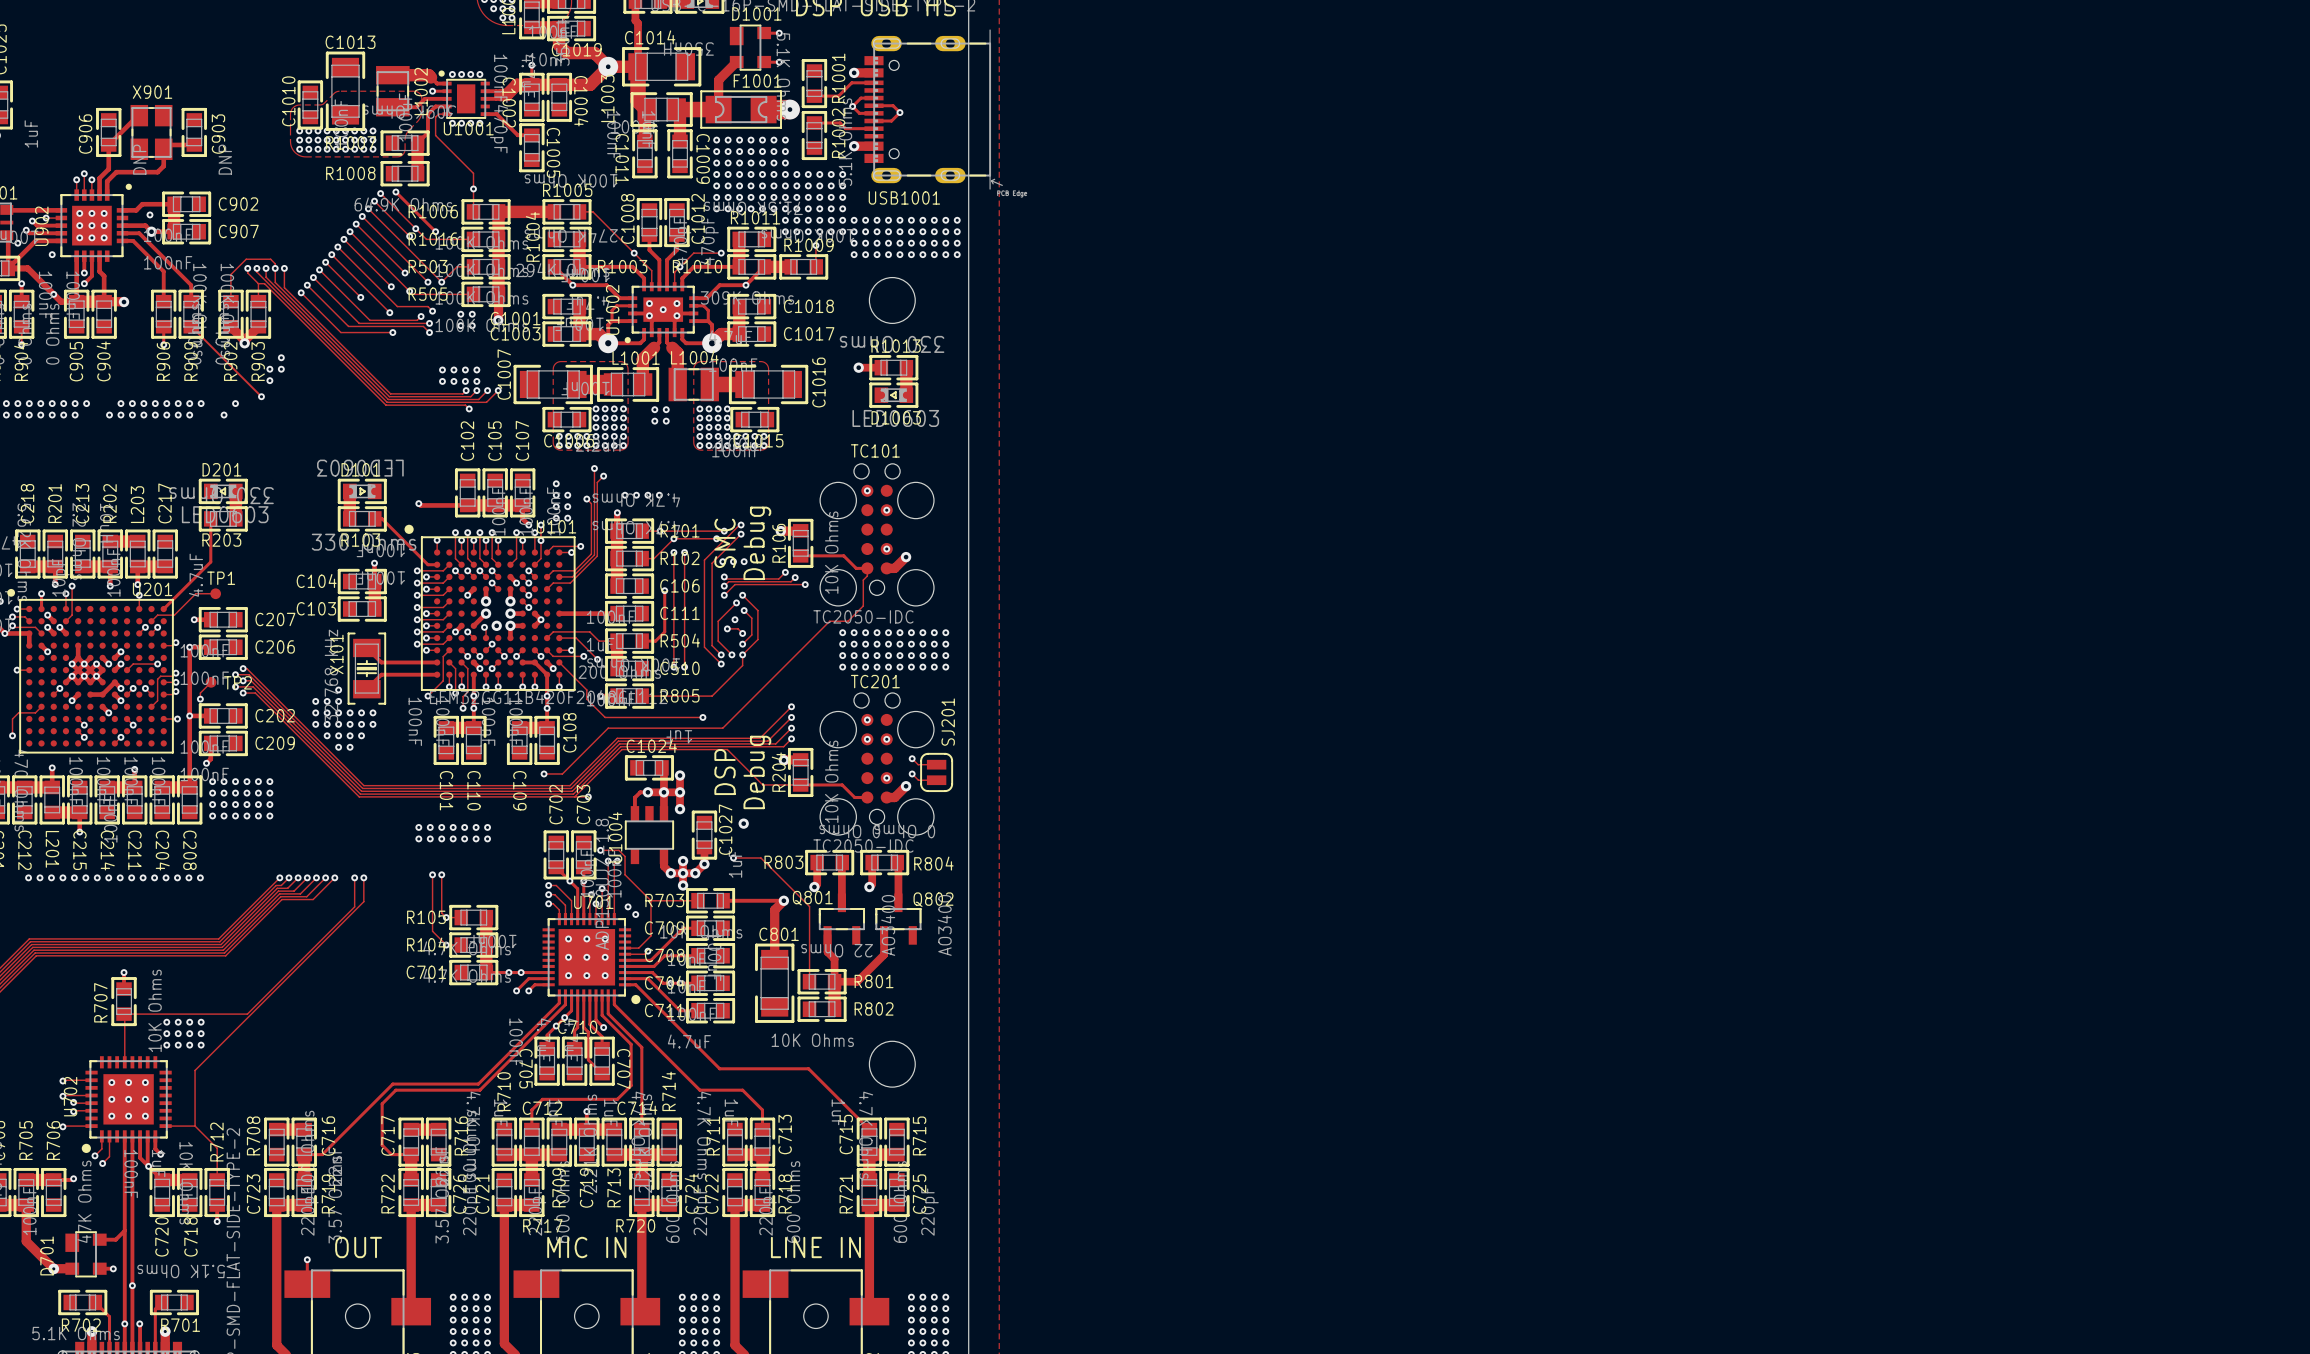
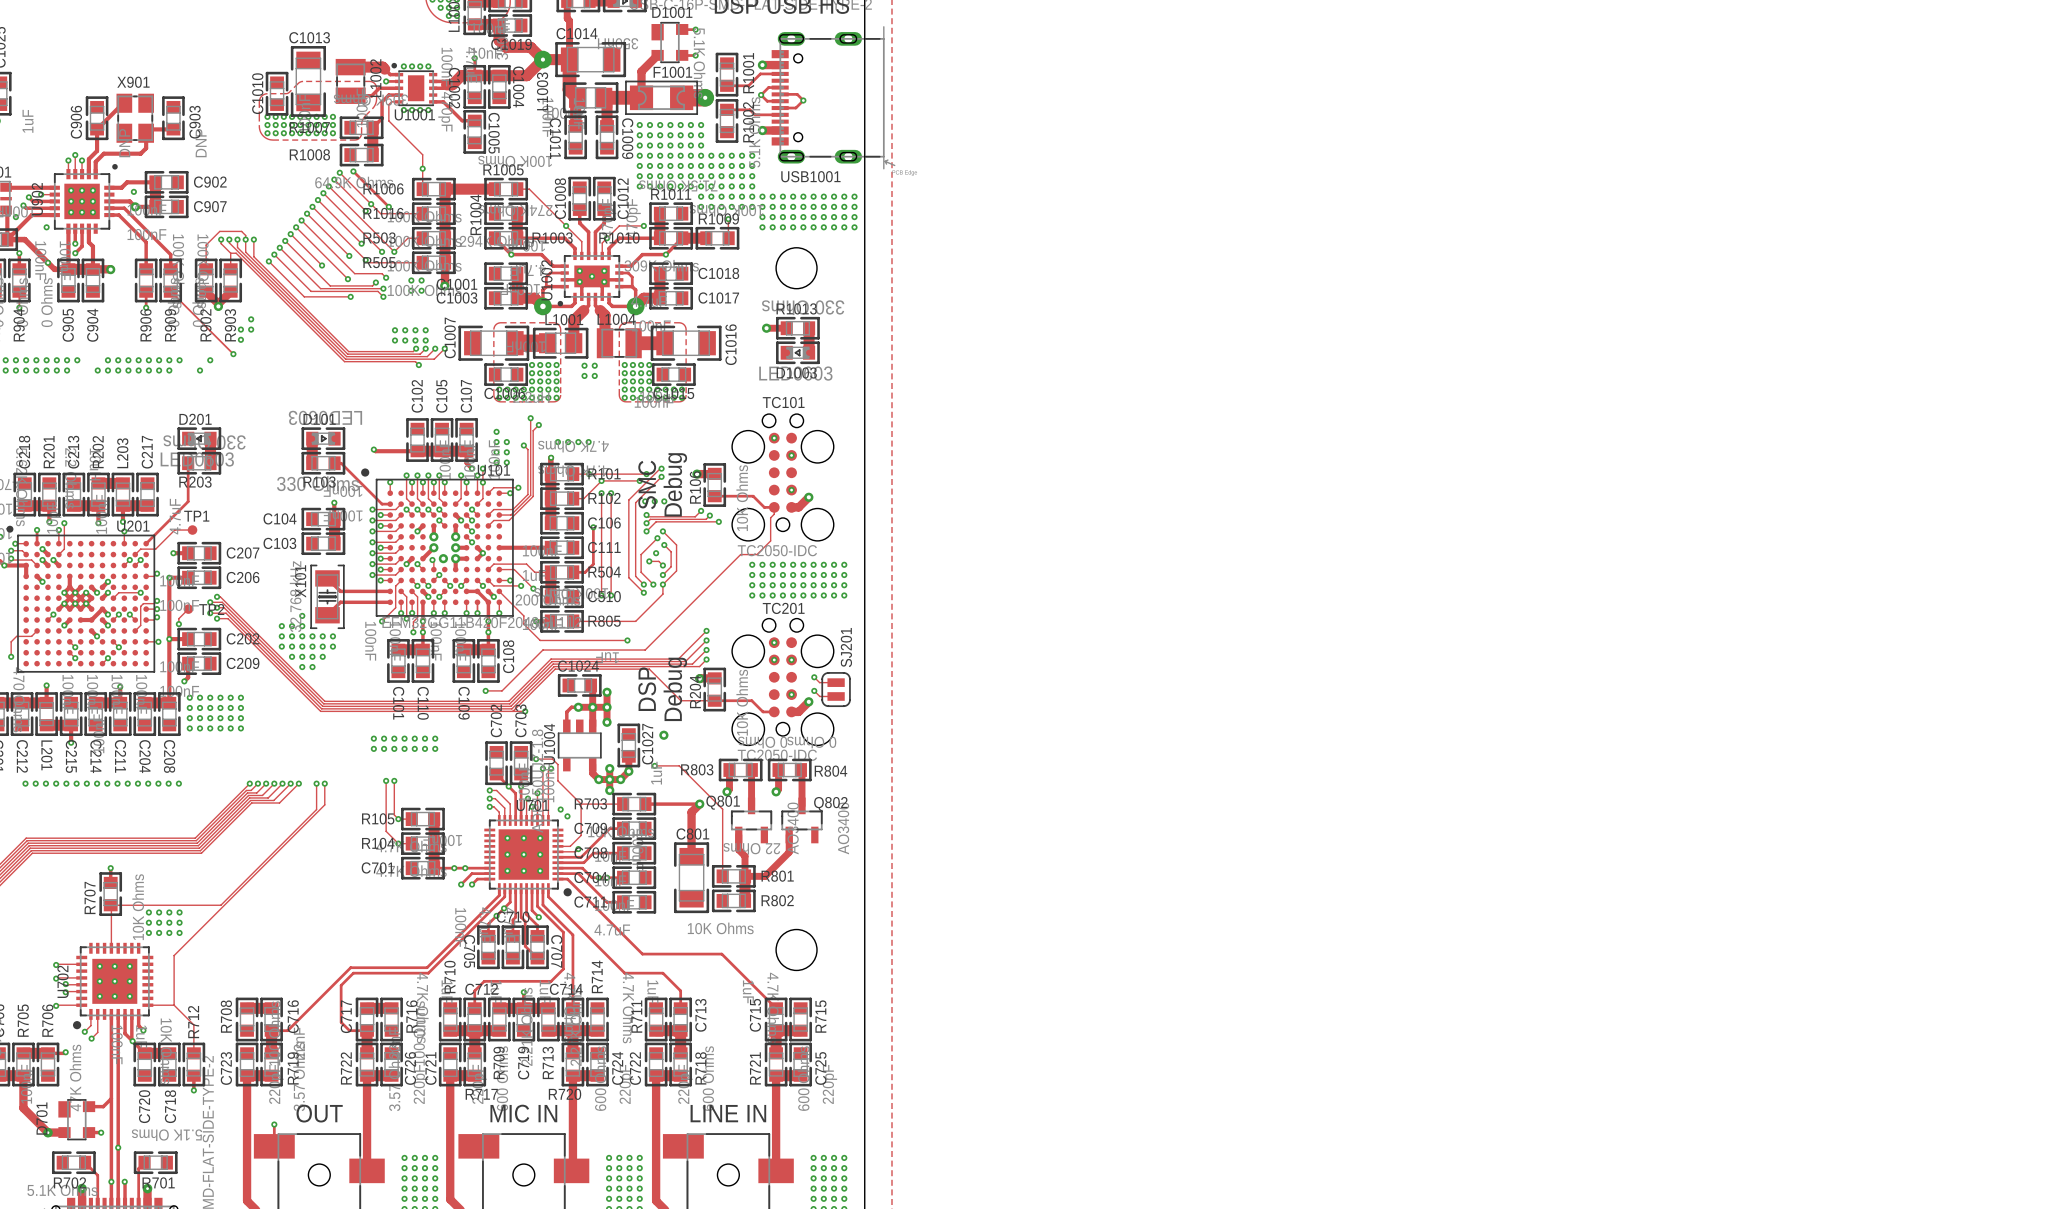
track: (17, 670) (29, 670) -> none
via: (17, 670) -> none

